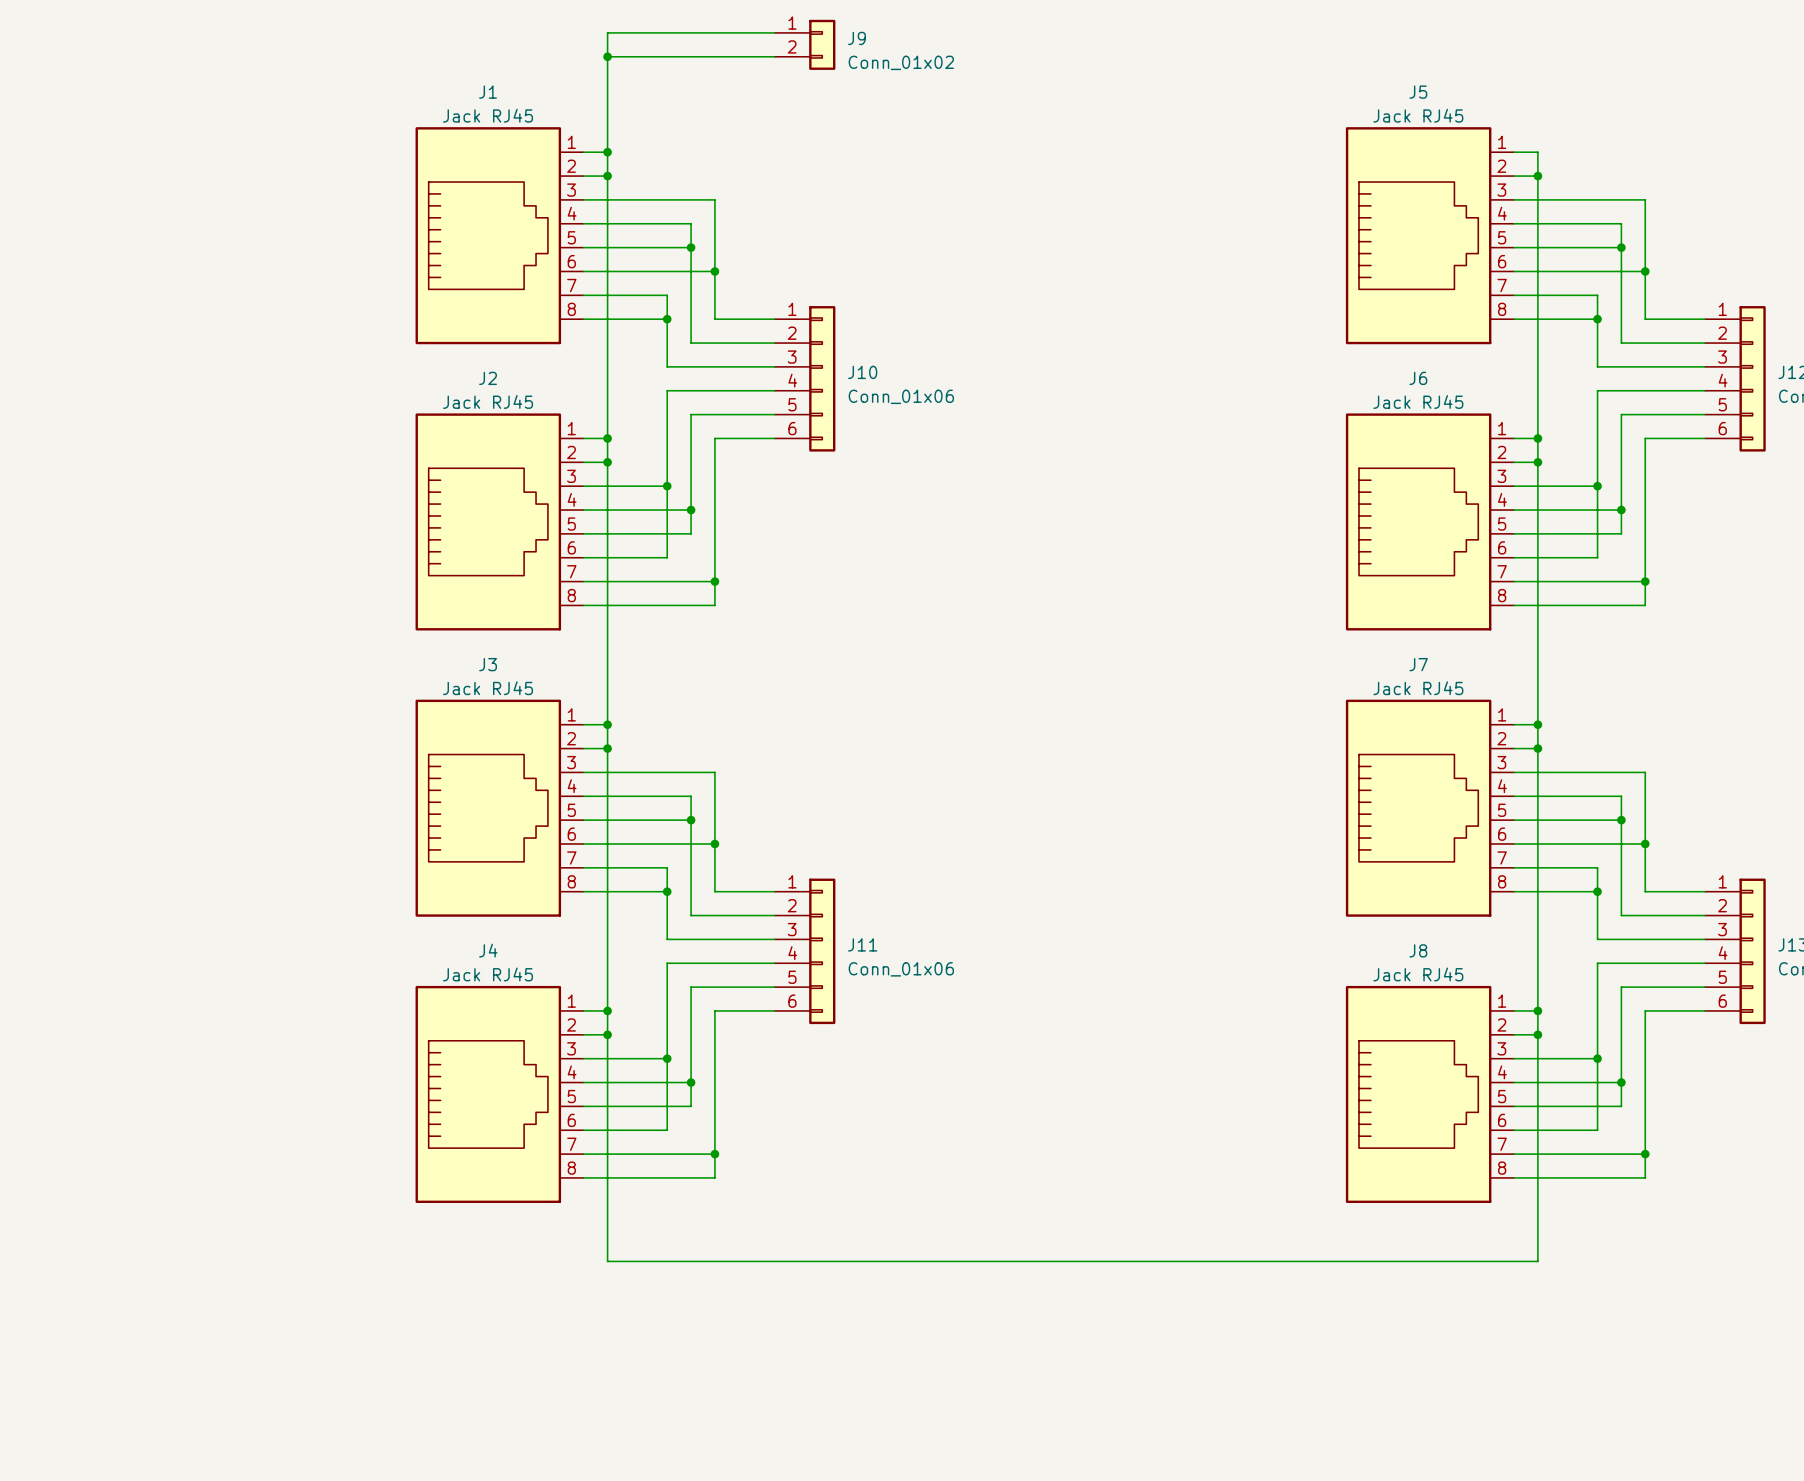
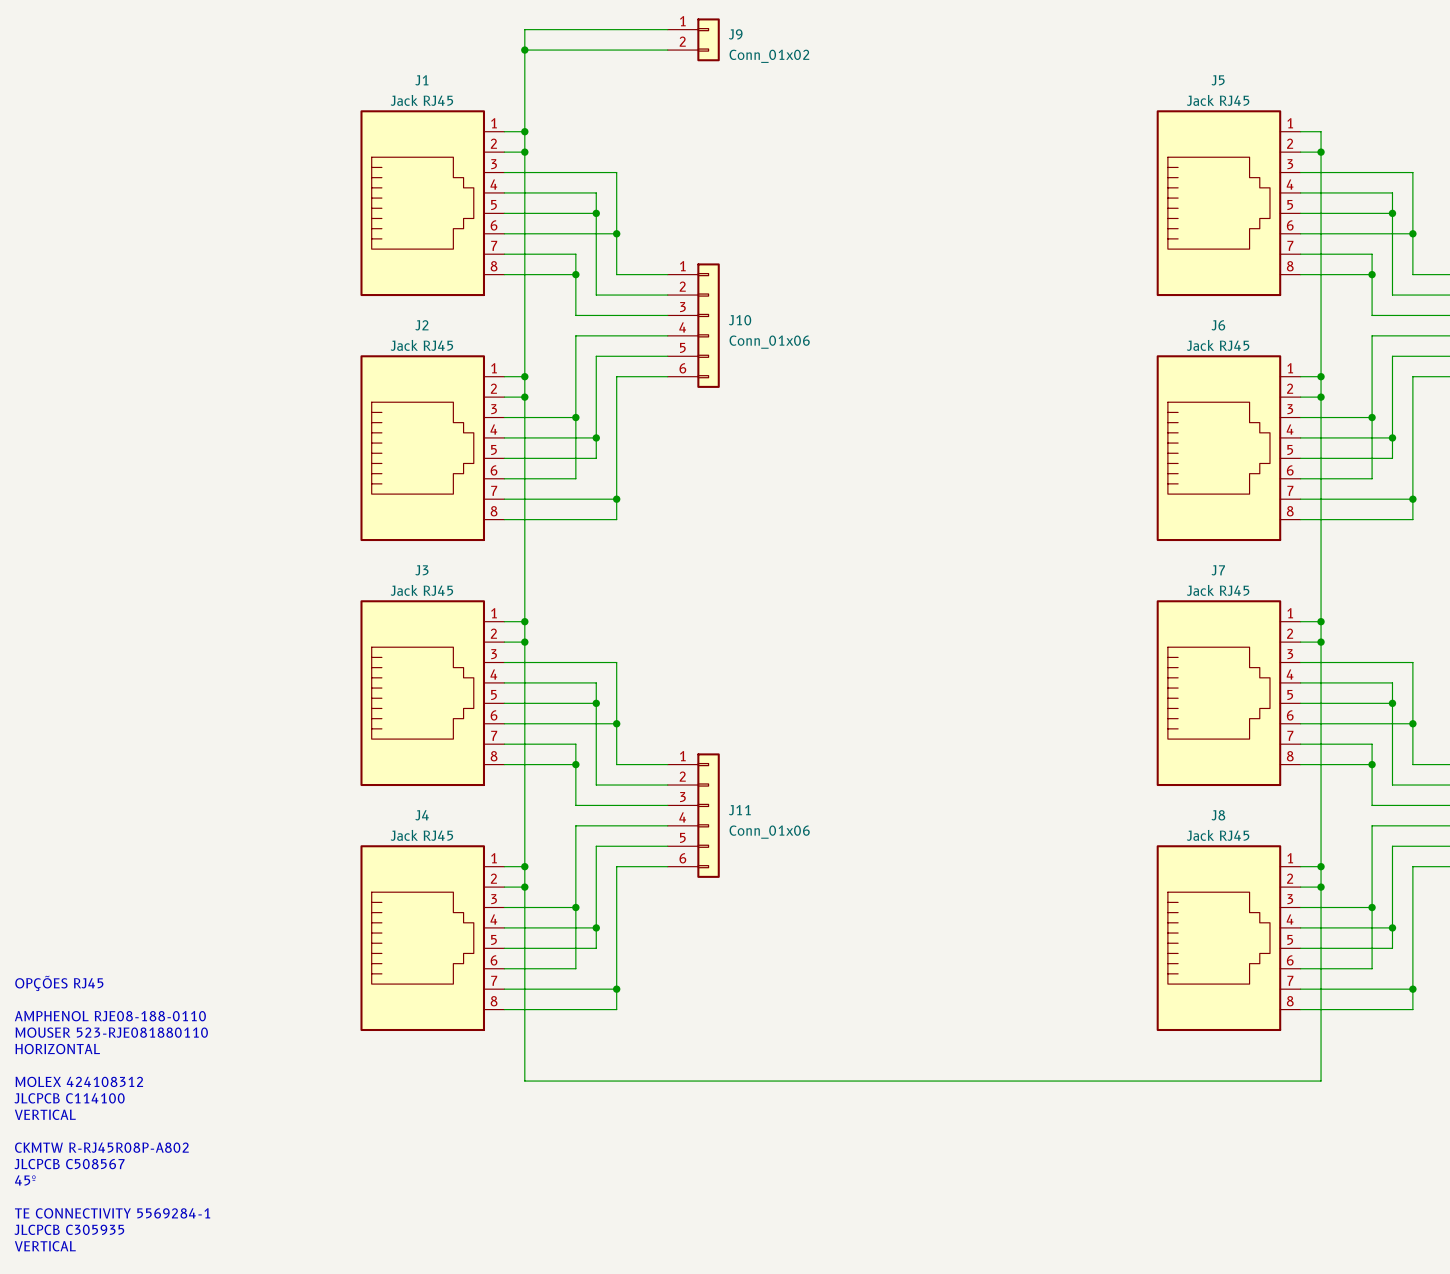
text: none -> OPÇÕES RJ45 (59, 983)
text: none -> AMPHENOL RJE08-188-0110 (110, 1016)
text: none -> MOUSER 523-RJE081880110 (111, 1032)
text: none -> HORIZONTAL (57, 1049)
text: none -> MOLEX 424108312 (79, 1081)
text: none -> JLCPCB C114100 (69, 1098)
text: none -> VERTICAL (45, 1114)
text: none -> CKMTW R-RJ45R08P-A802 (101, 1147)
text: none -> JLCPCB C508567 (69, 1164)
text: none -> 45º (25, 1180)
text: none -> TE CONNECTIVITY 5569284-1 (112, 1213)
text: none -> JLCPCB C305935 (69, 1229)
text: none -> VERTICAL (45, 1246)

